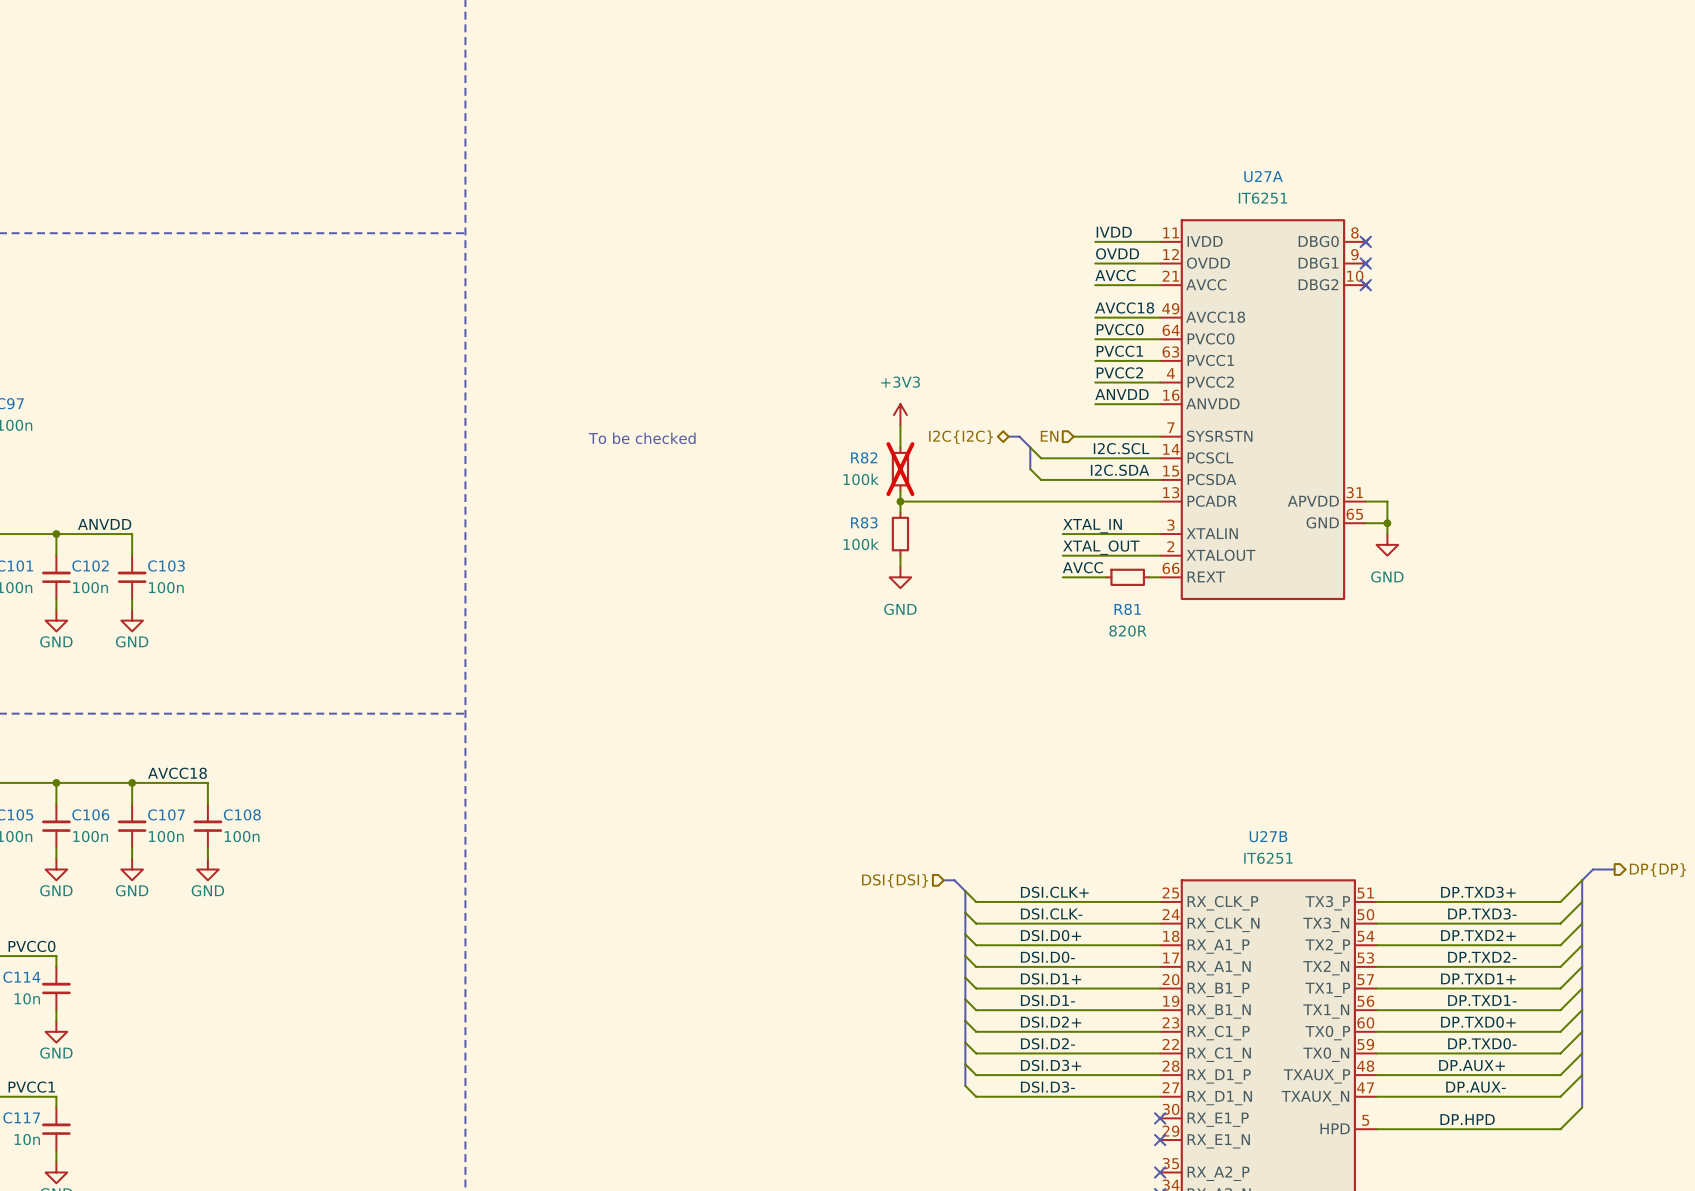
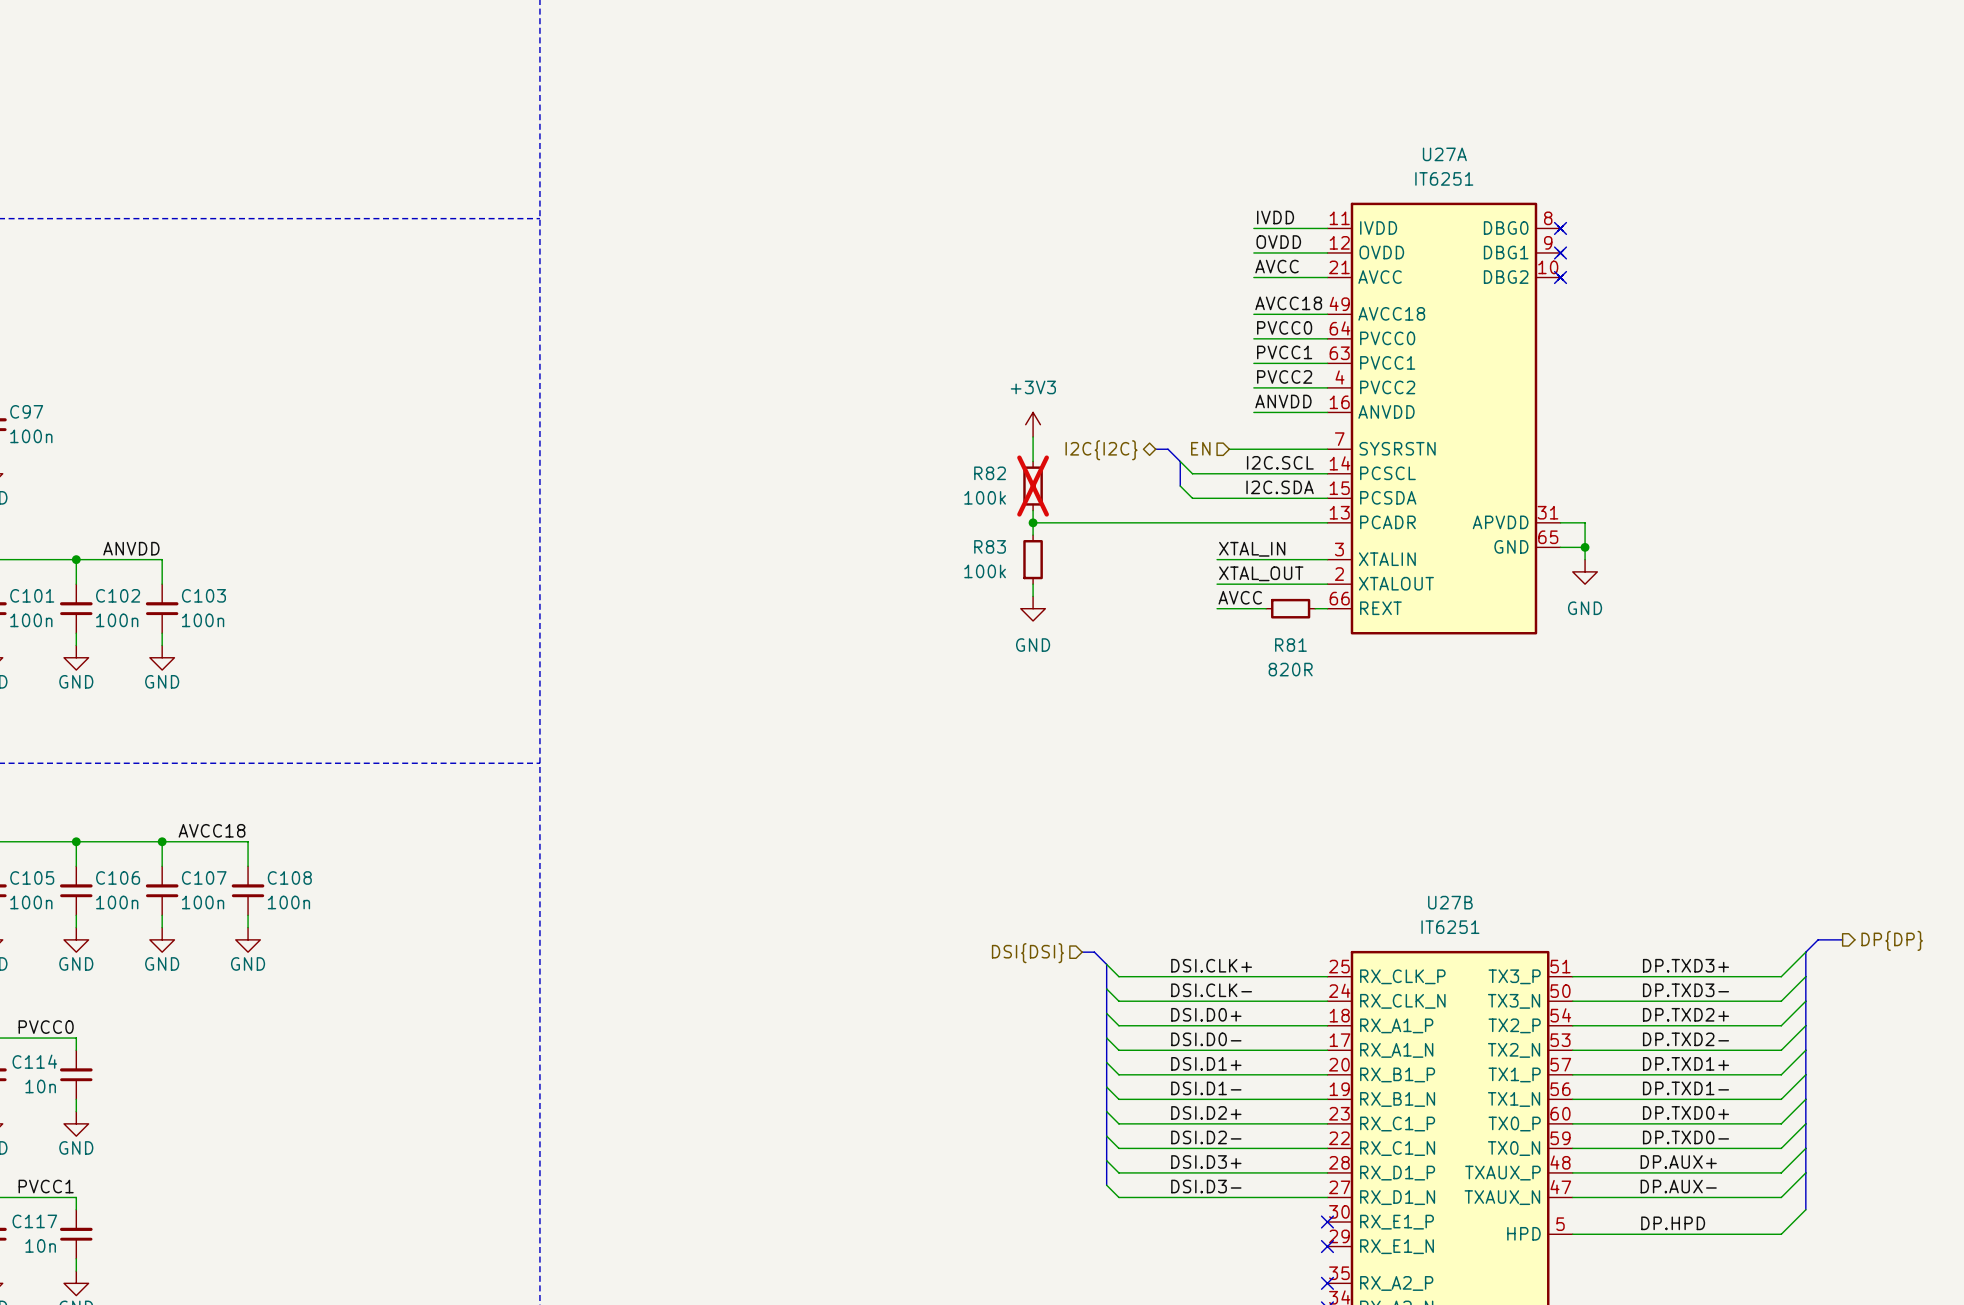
text: To be checked (642, 438) -> none

